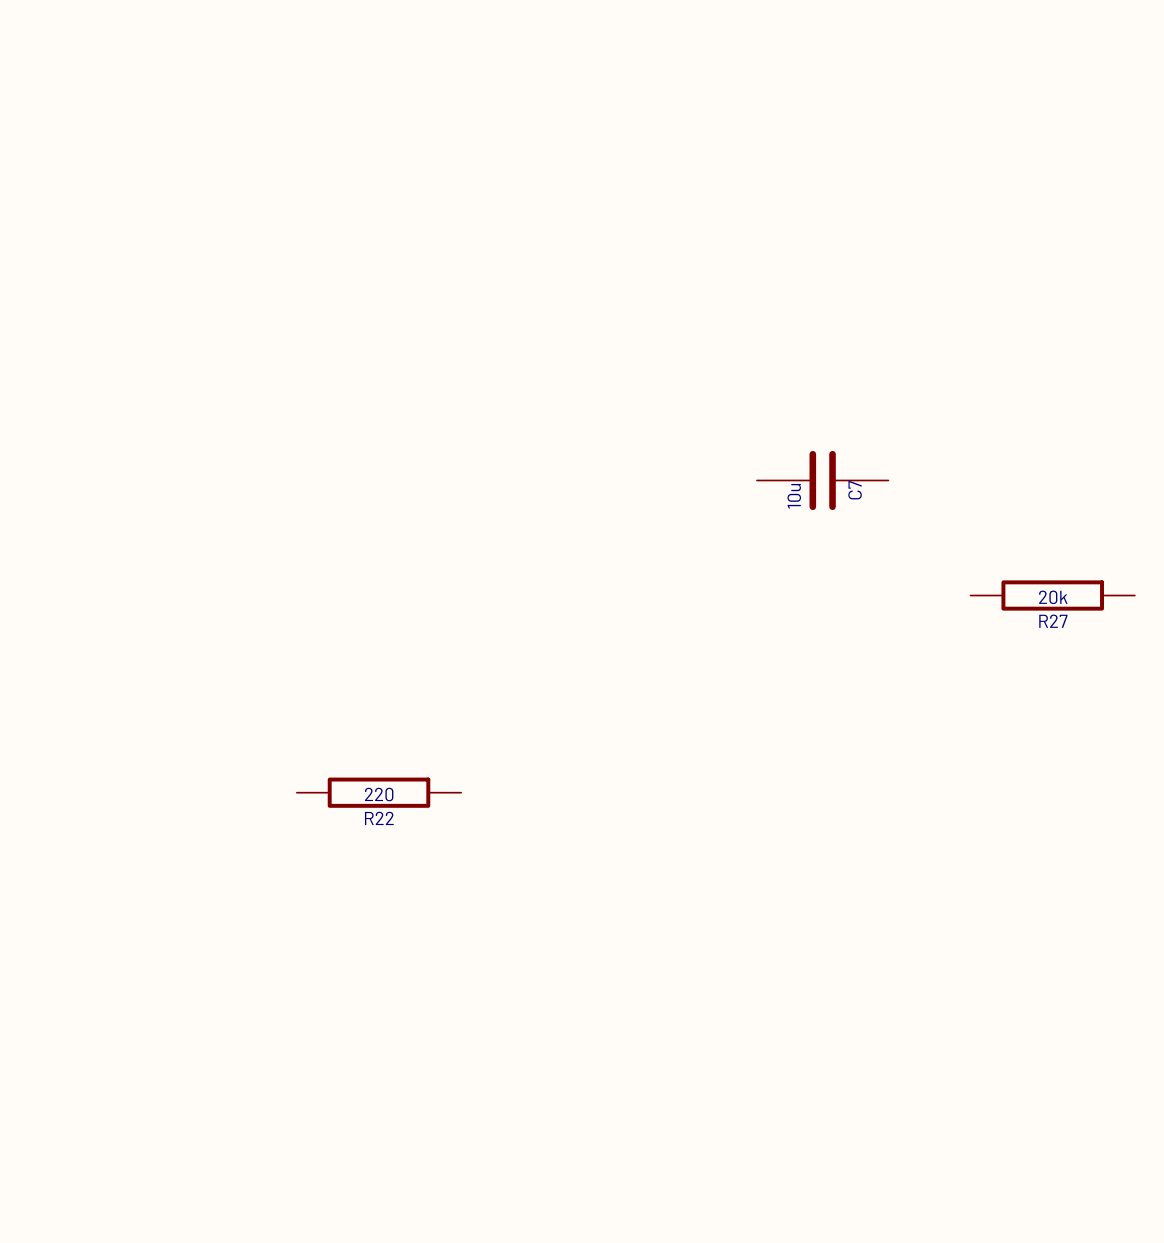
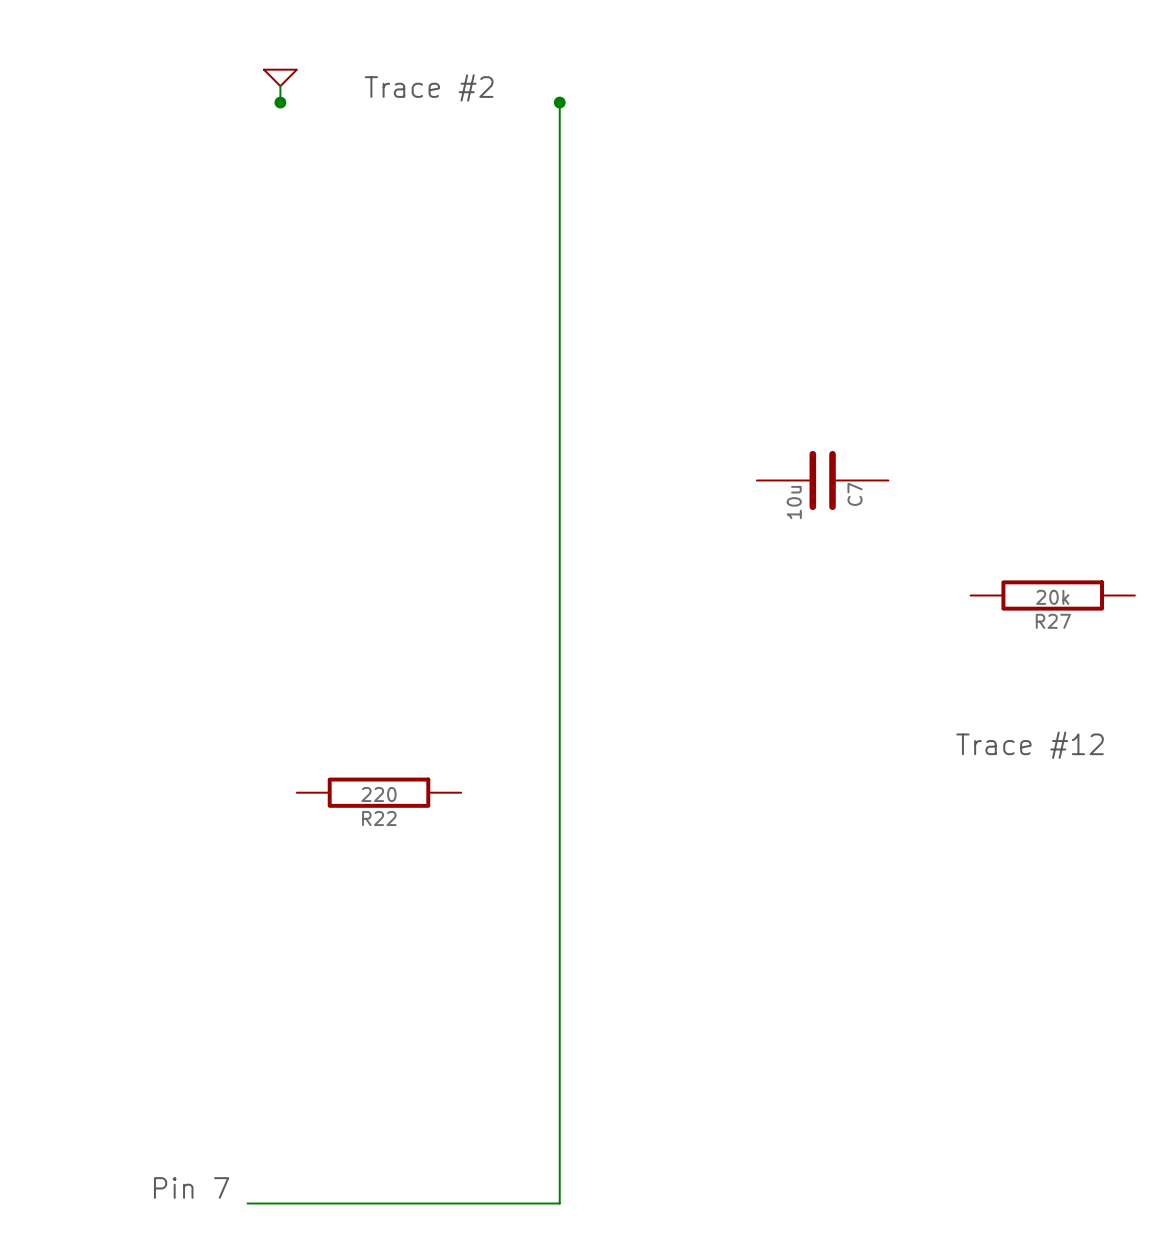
power symbol: none -> (280, 77)
wire: none -> (280, 86) (280, 102)
text: none -> Trace #2 (429, 87)
junction: none -> (280, 102)
wire: none -> (559, 102) (559, 1203) (247, 1203)
junction: none -> (559, 102)
text: none -> Trace #12 (1030, 745)
text: none -> Pin 7 (191, 1187)

